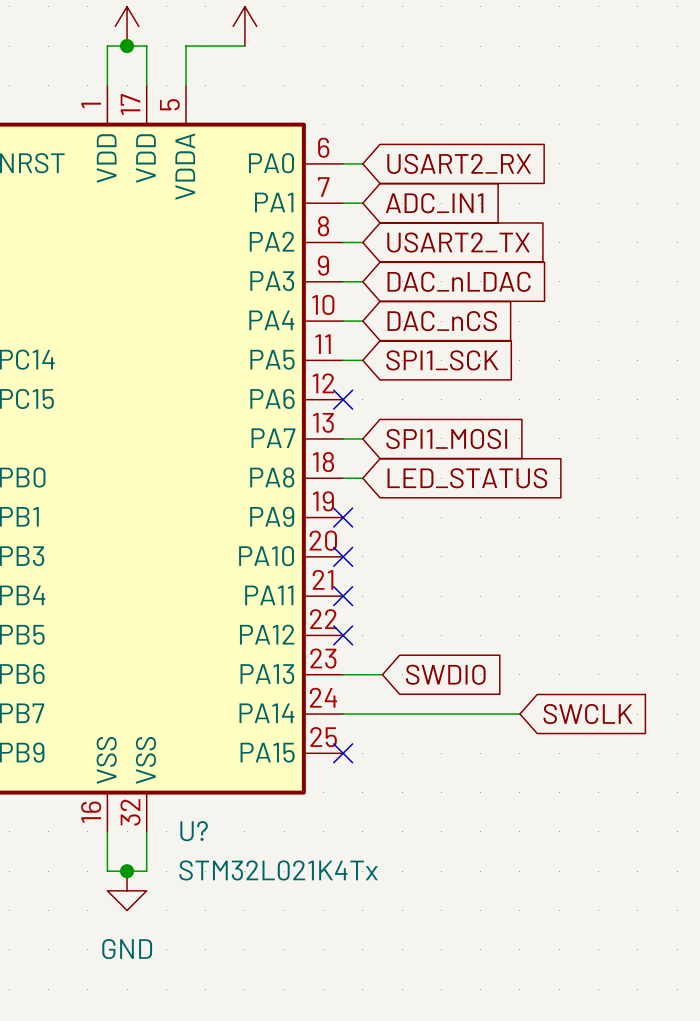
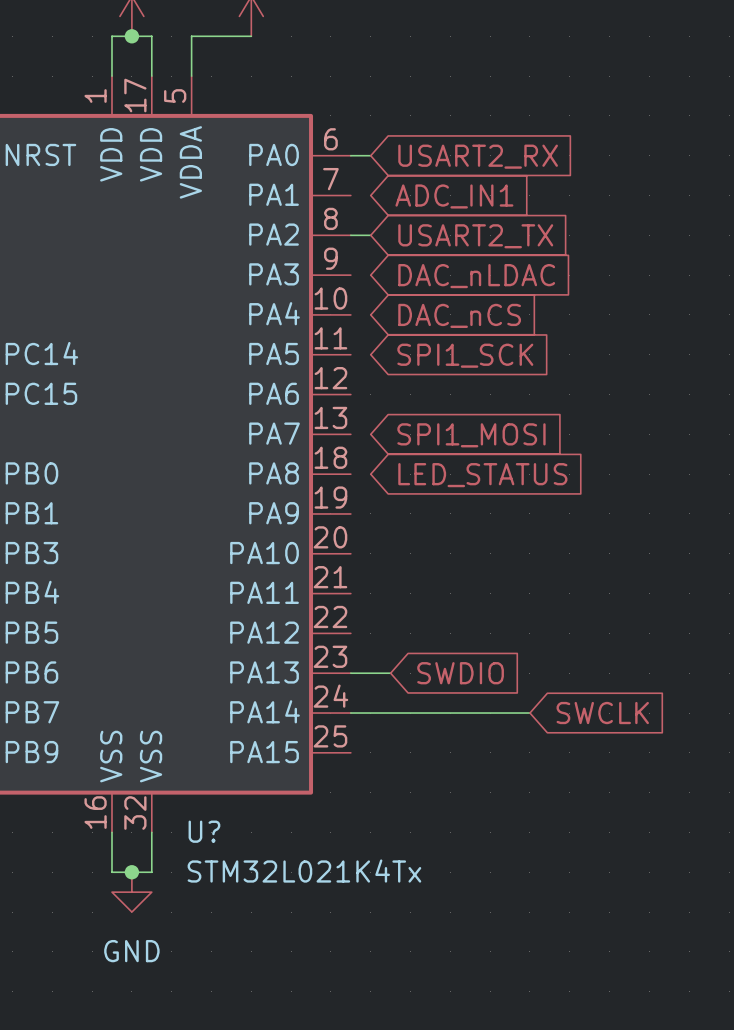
wire: (343, 203) (362, 203) -> none
wire: (343, 281) (362, 281) -> none
wire: (343, 321) (362, 321) -> none
wire: (343, 360) (362, 360) -> none
no-connect mark: (343, 399) -> none
wire: (343, 438) (362, 438) -> none
wire: (343, 478) (362, 478) -> none
no-connect mark: (343, 517) -> none
no-connect mark: (343, 556) -> none
no-connect mark: (343, 596) -> none
no-connect mark: (343, 635) -> none
no-connect mark: (343, 753) -> none

